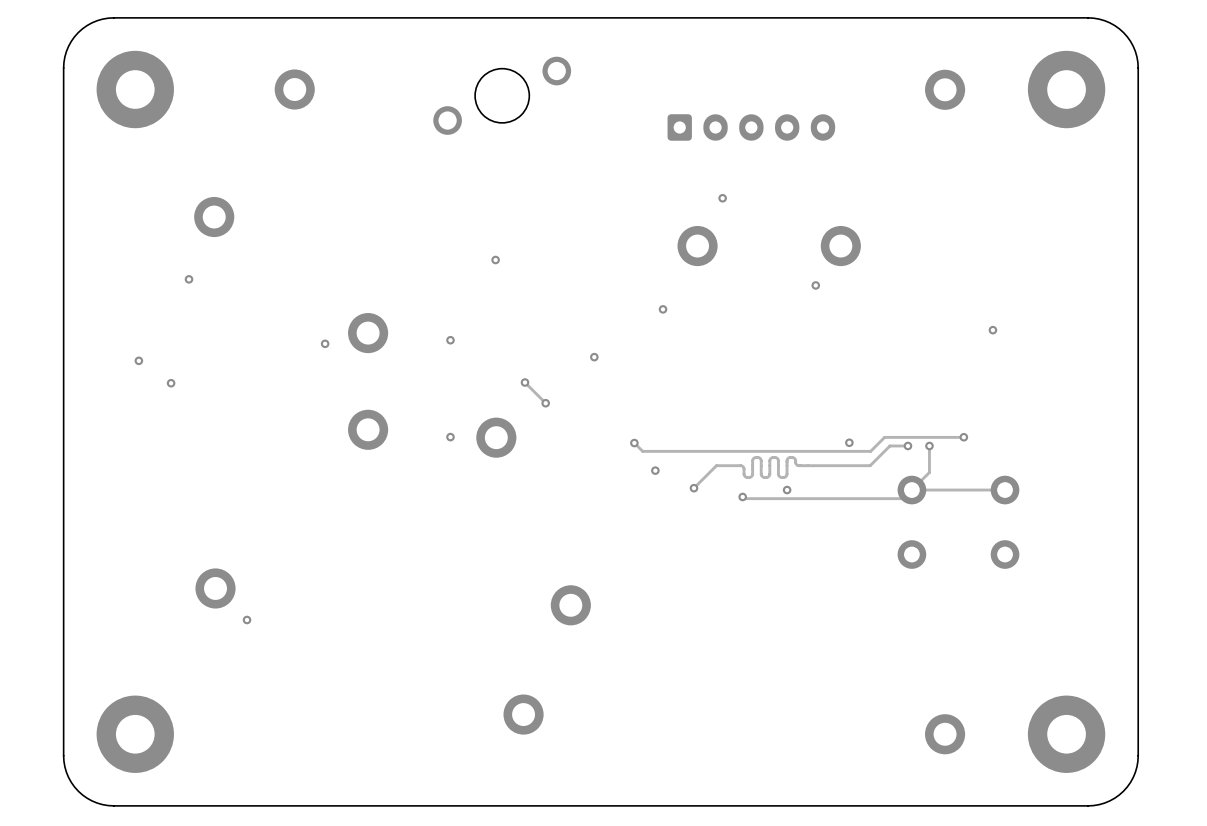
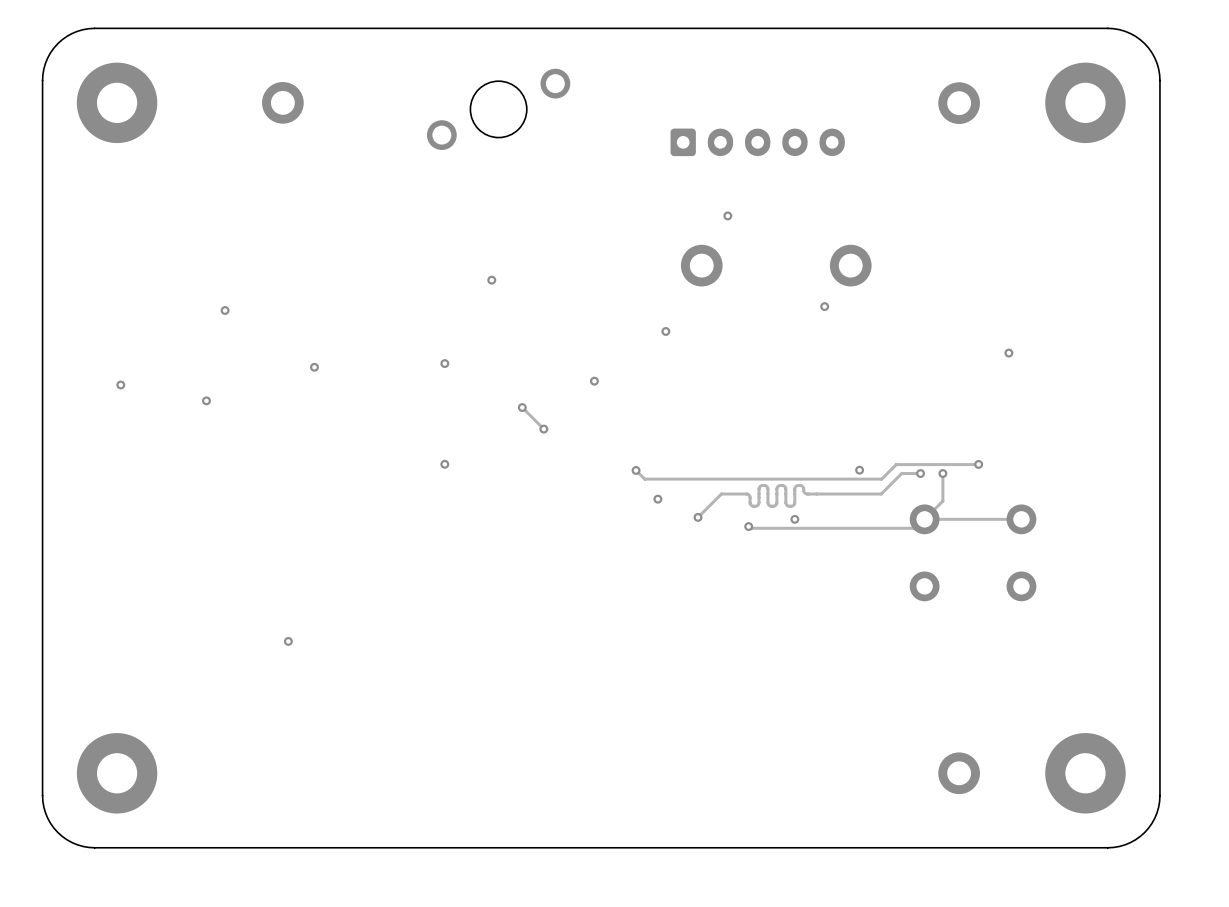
part: (214, 217) -> none
via: (189, 279) -> none
via: none -> (225, 310)
part: (368, 333) -> none
via position: (171, 383) -> (206, 400)
part: (368, 429) -> none
part: (496, 437) -> none
part: (215, 588) -> none
part: (570, 605) -> none
via position: (247, 619) -> (288, 641)
part: (523, 714) -> none

